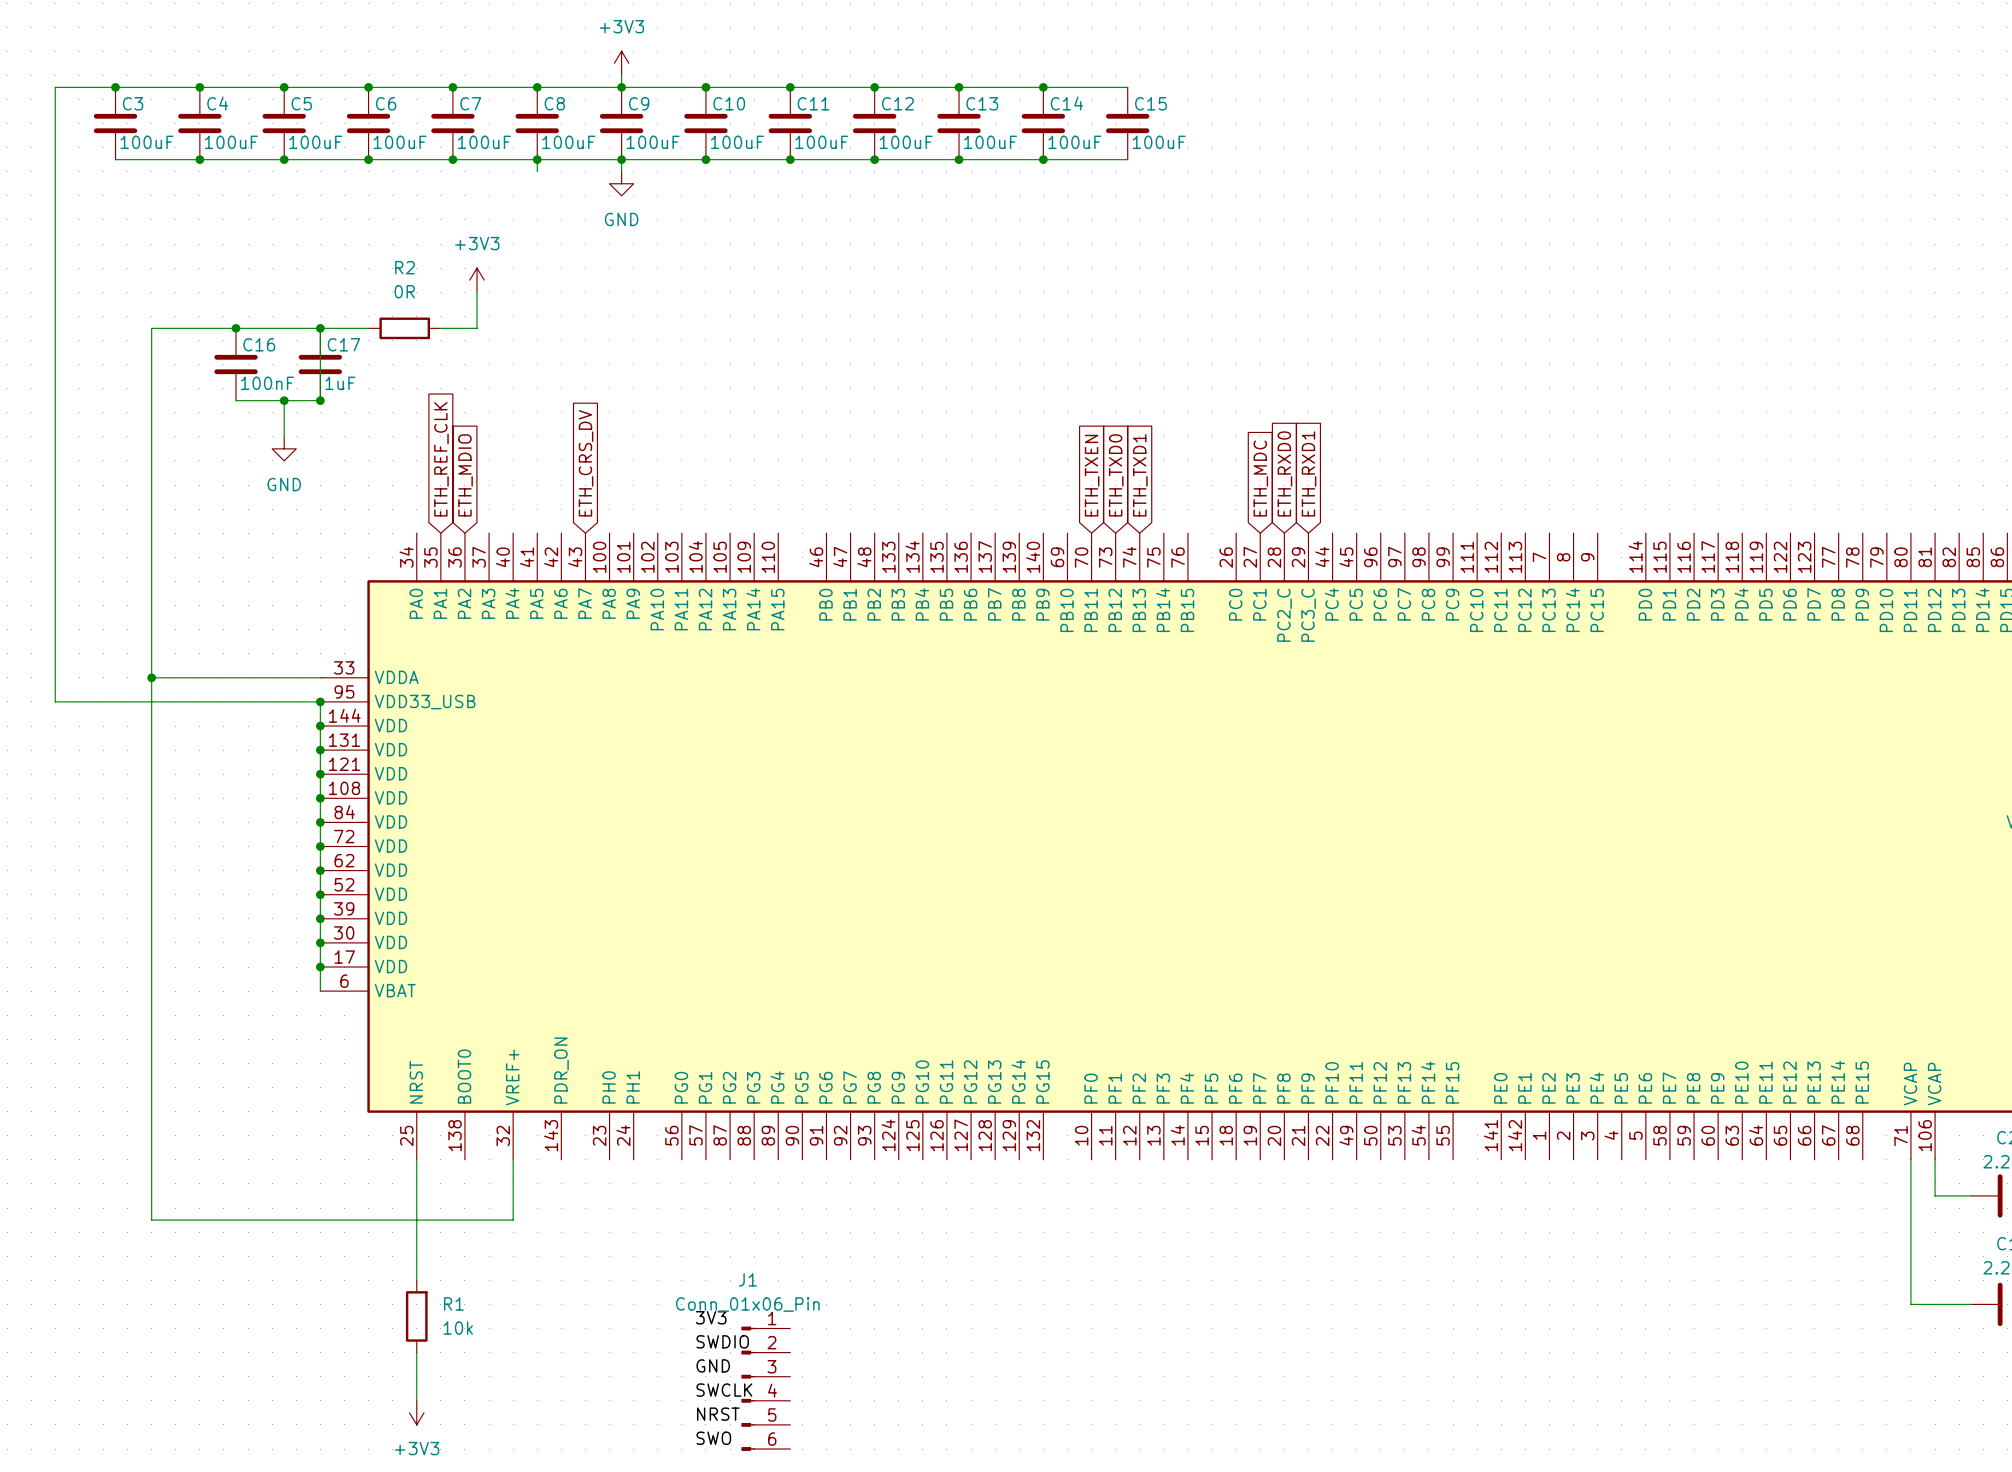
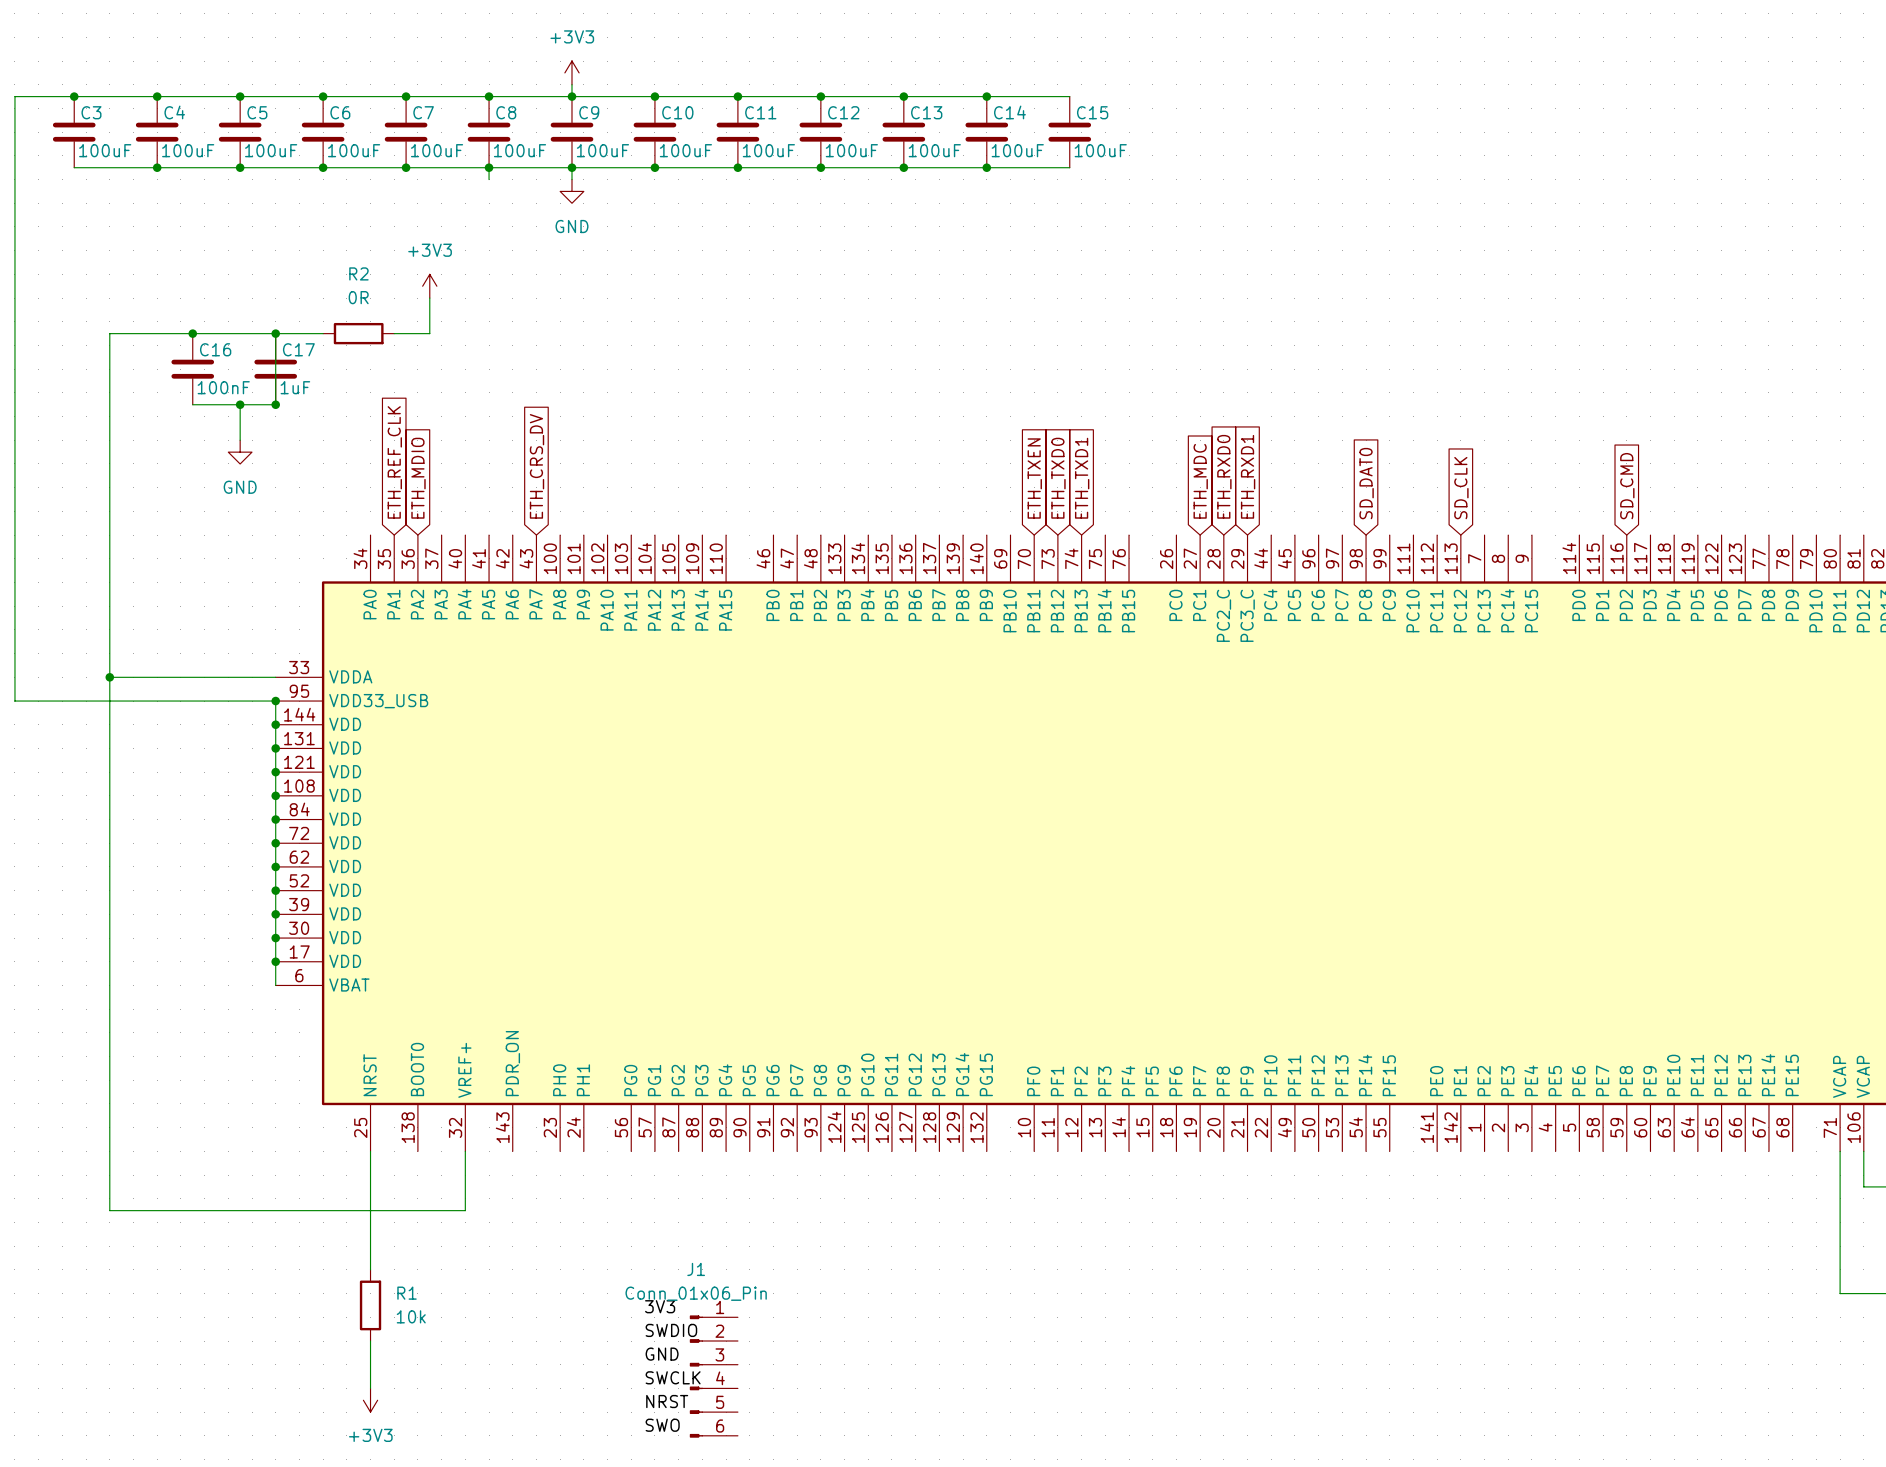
global label: none -> SD_DAT0 (1366, 483)
global label: none -> SD_CMD (1627, 486)
global label: none -> SD_CLK (1461, 488)

